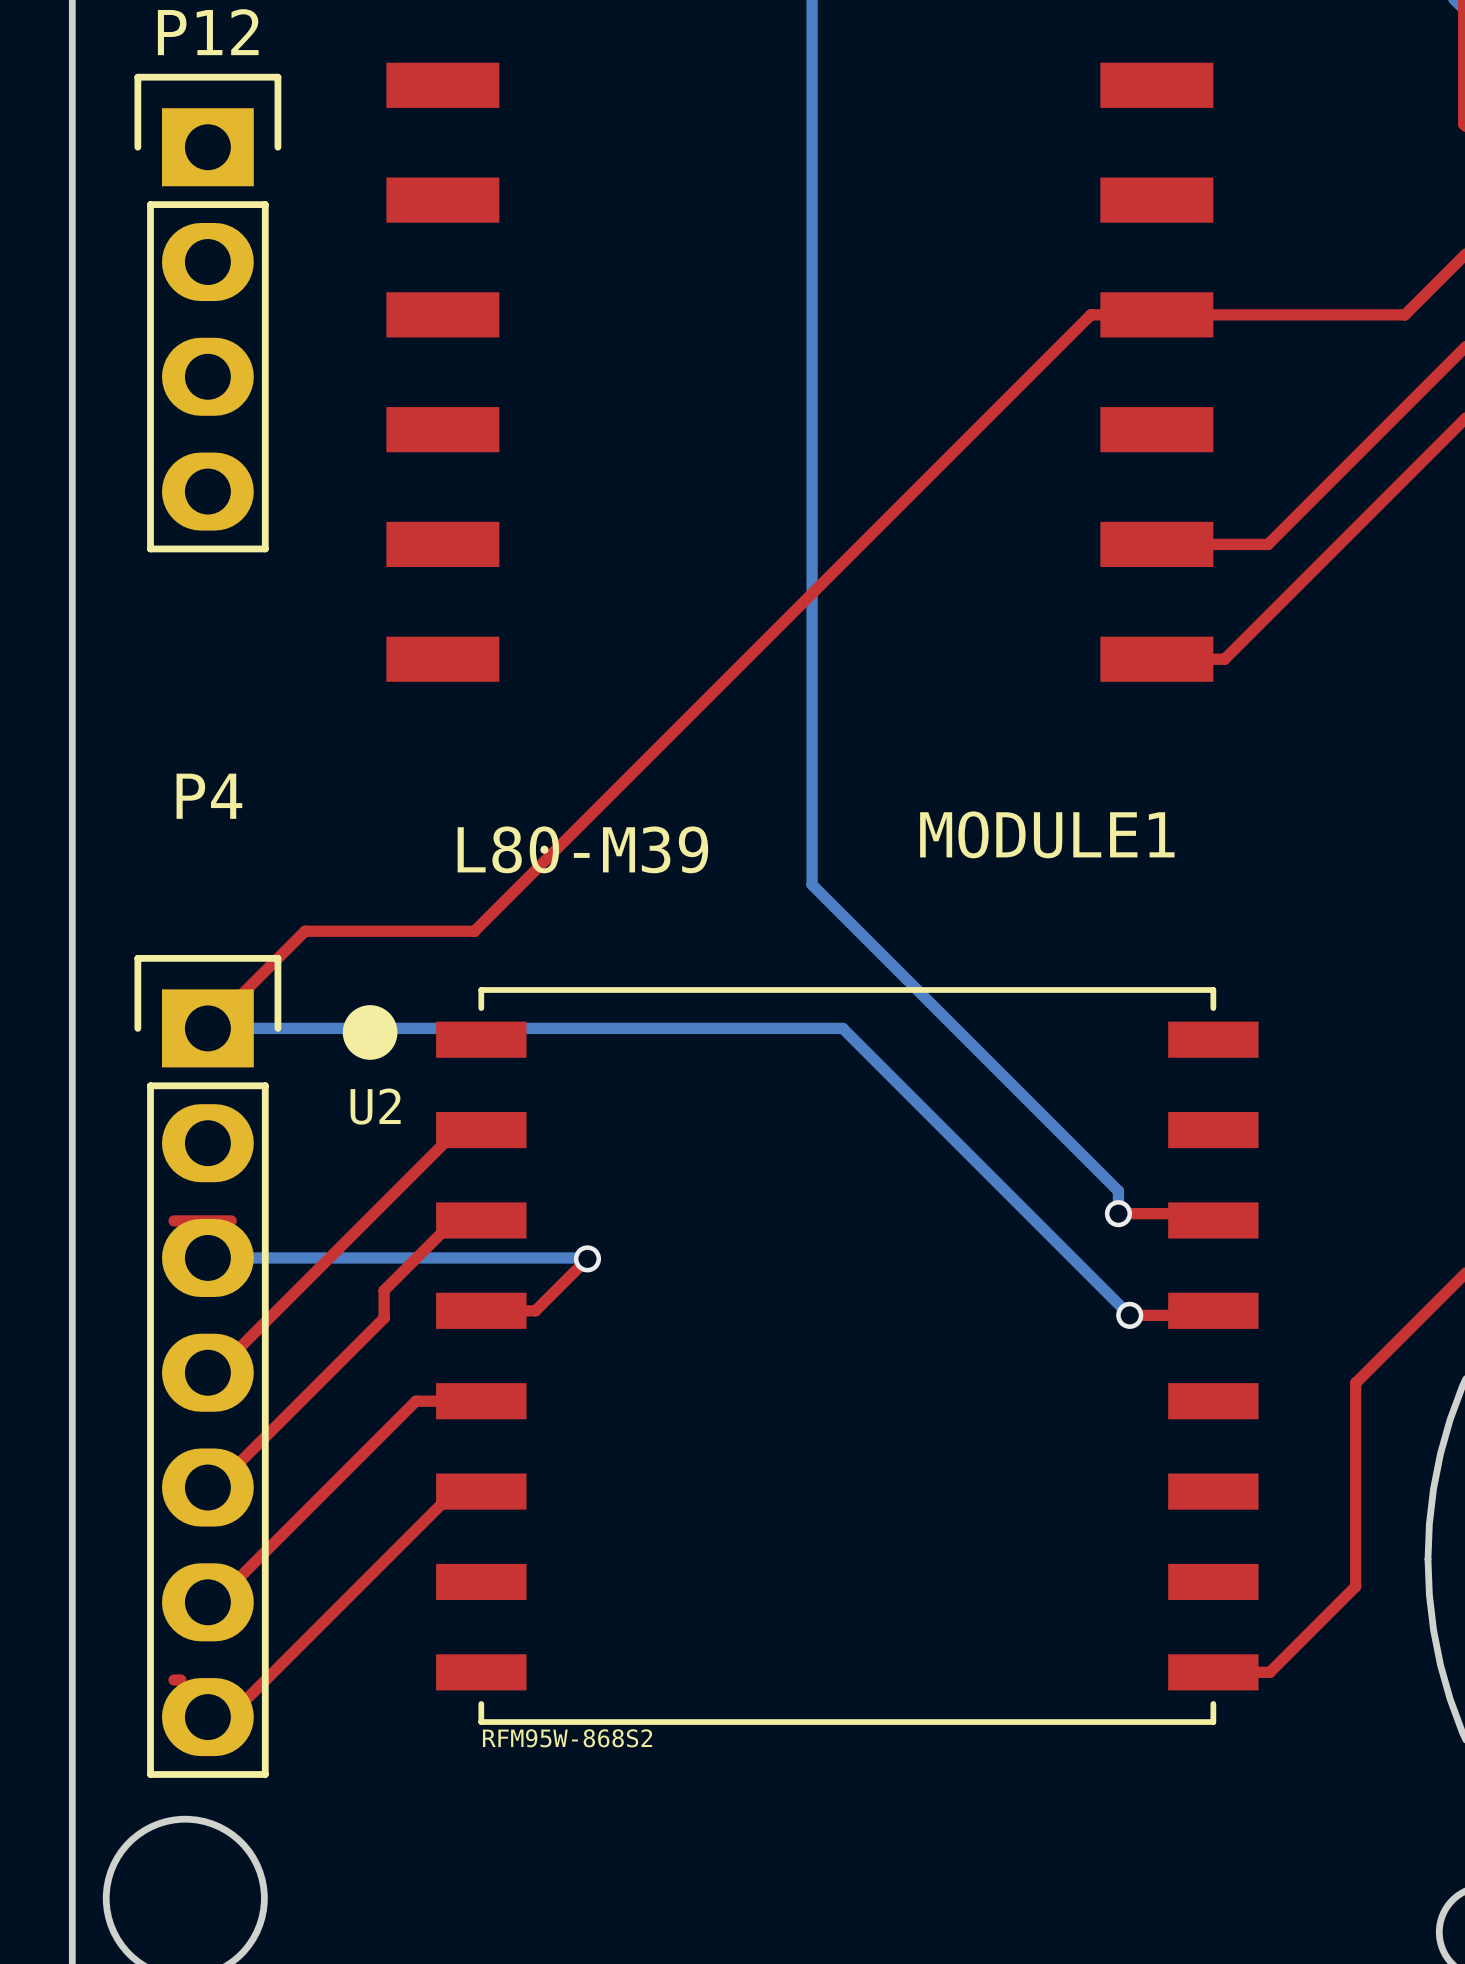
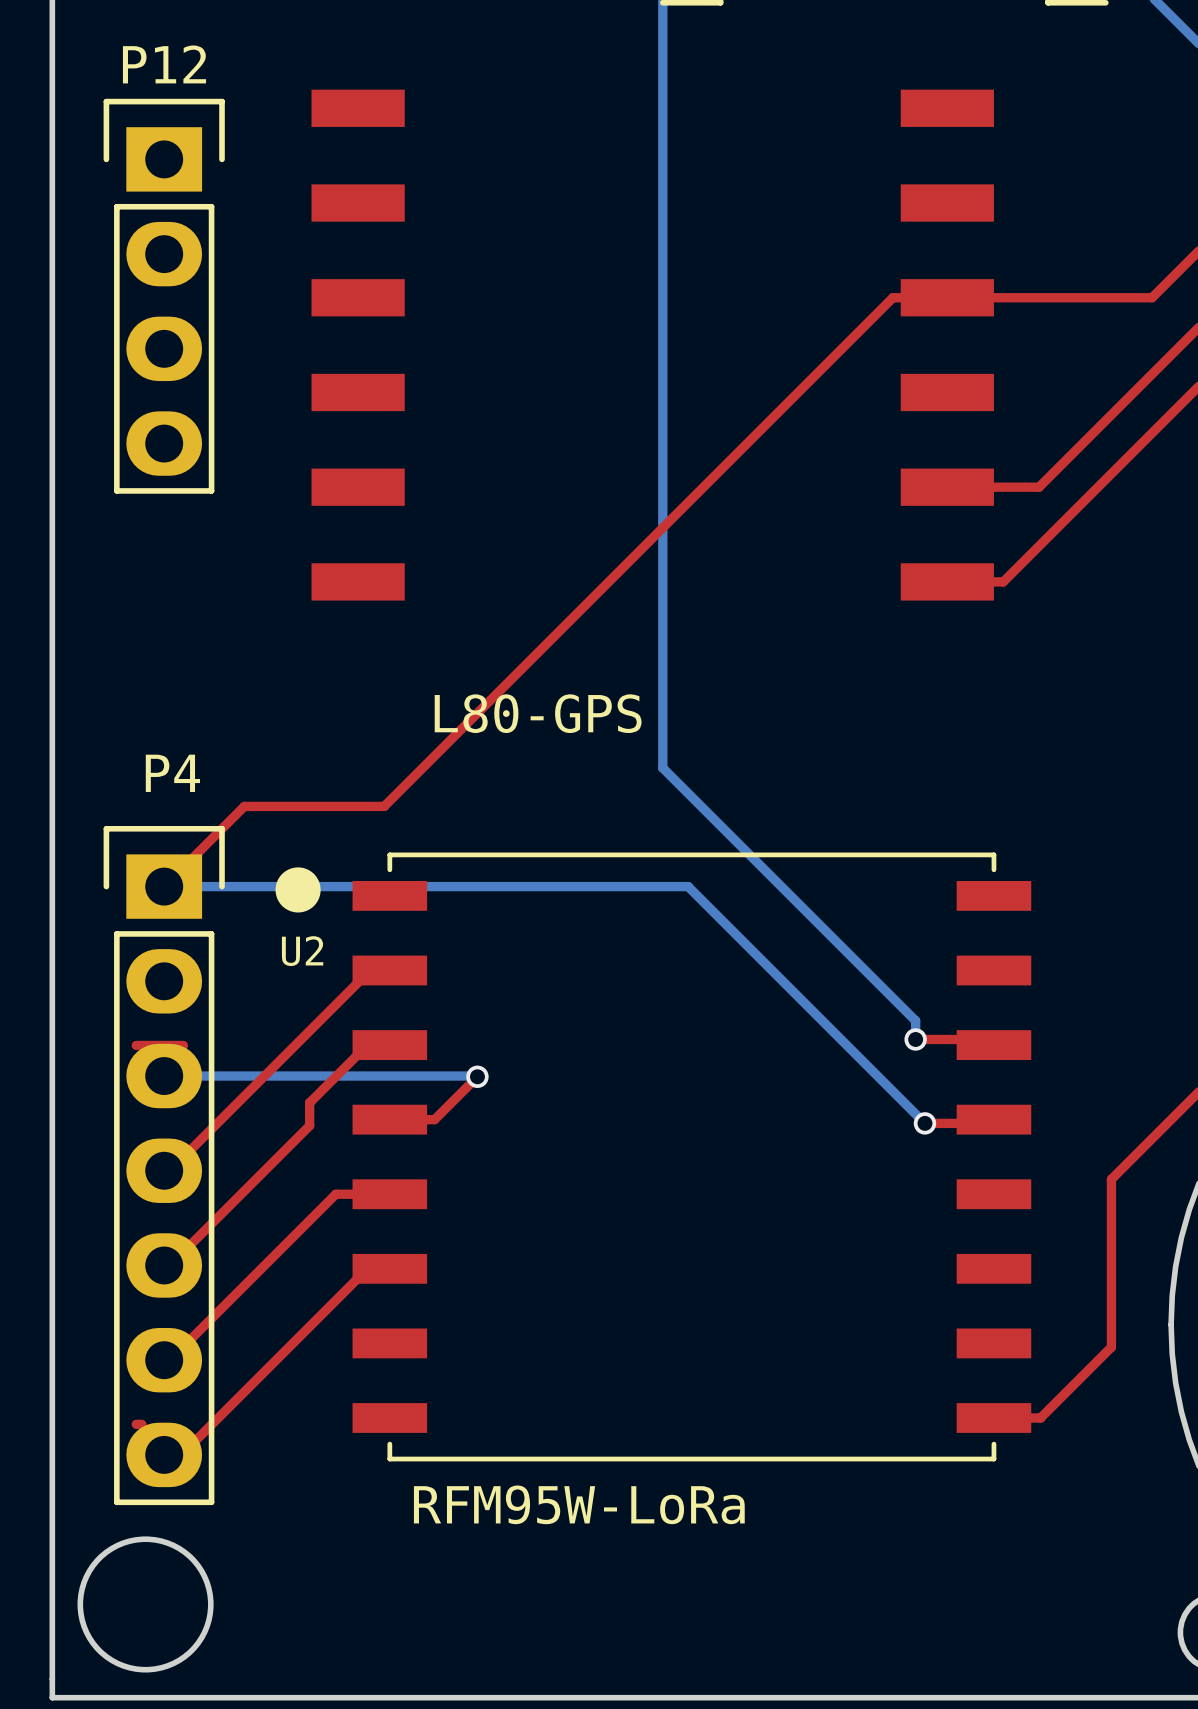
P4 name position: P4 (209, 796) -> P4 (172, 773)
MODULE1 name: MODULE1 (1047, 834) -> none
MODULE1 value: L80-M39 (582, 849) -> L80-GPS (538, 713)
U2 value: RFM95W-868S2 (567, 1738) -> RFM95W-LoRa (579, 1504)

